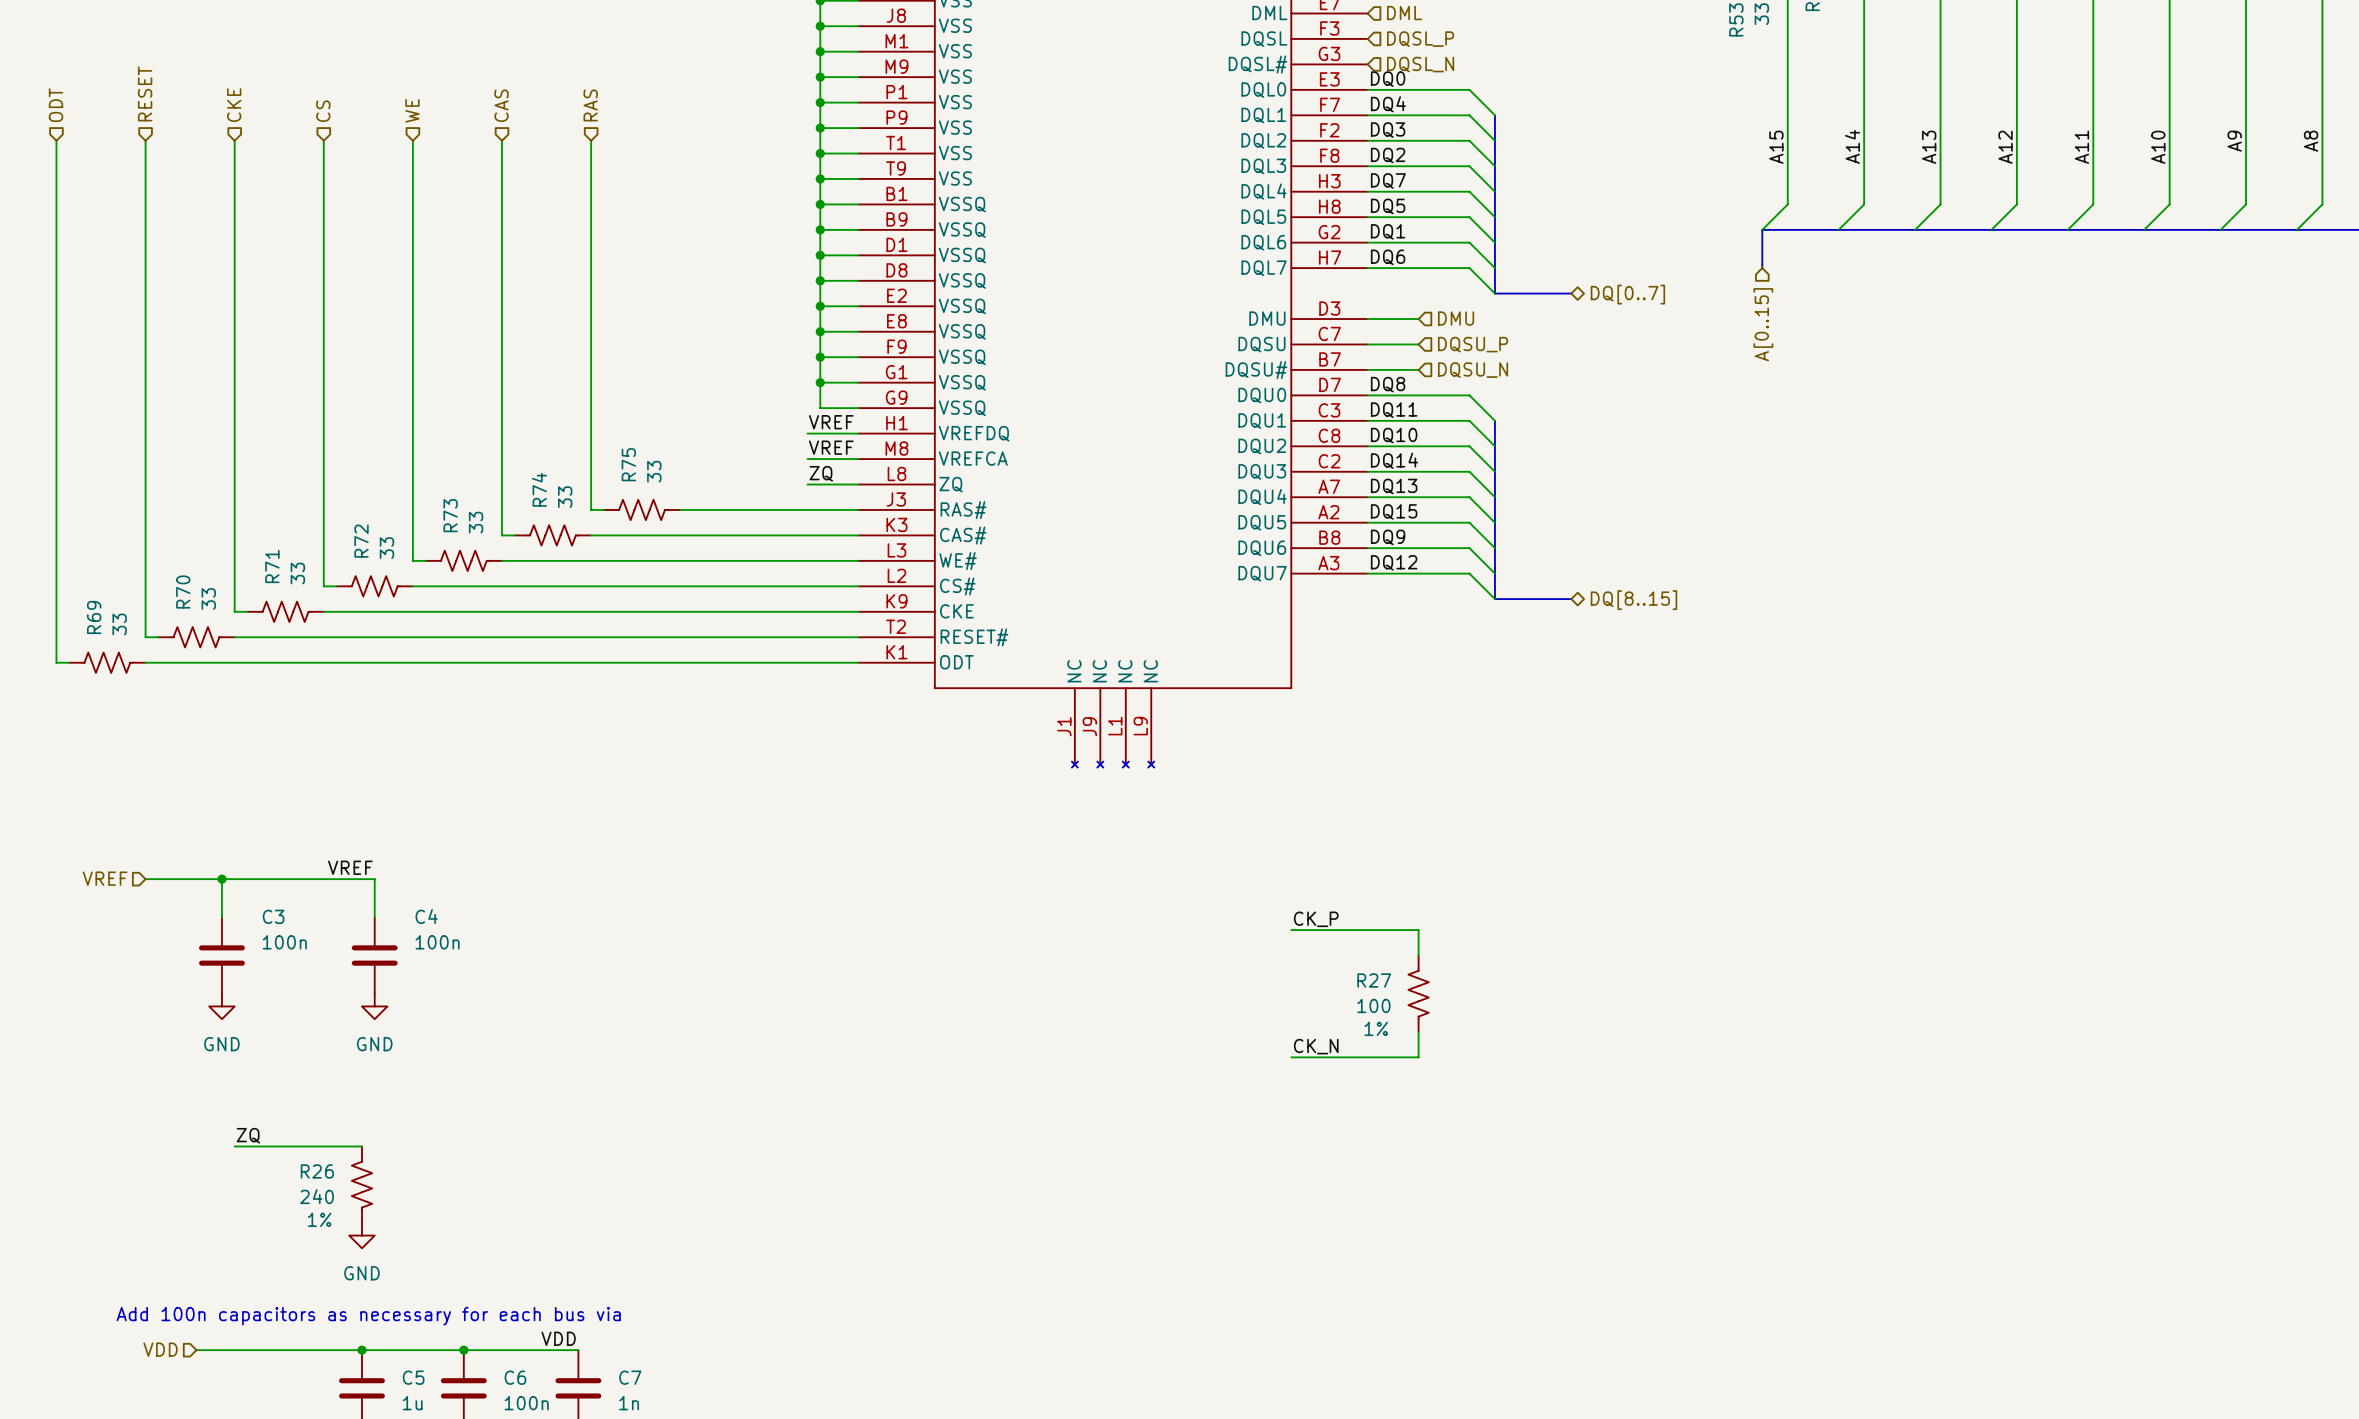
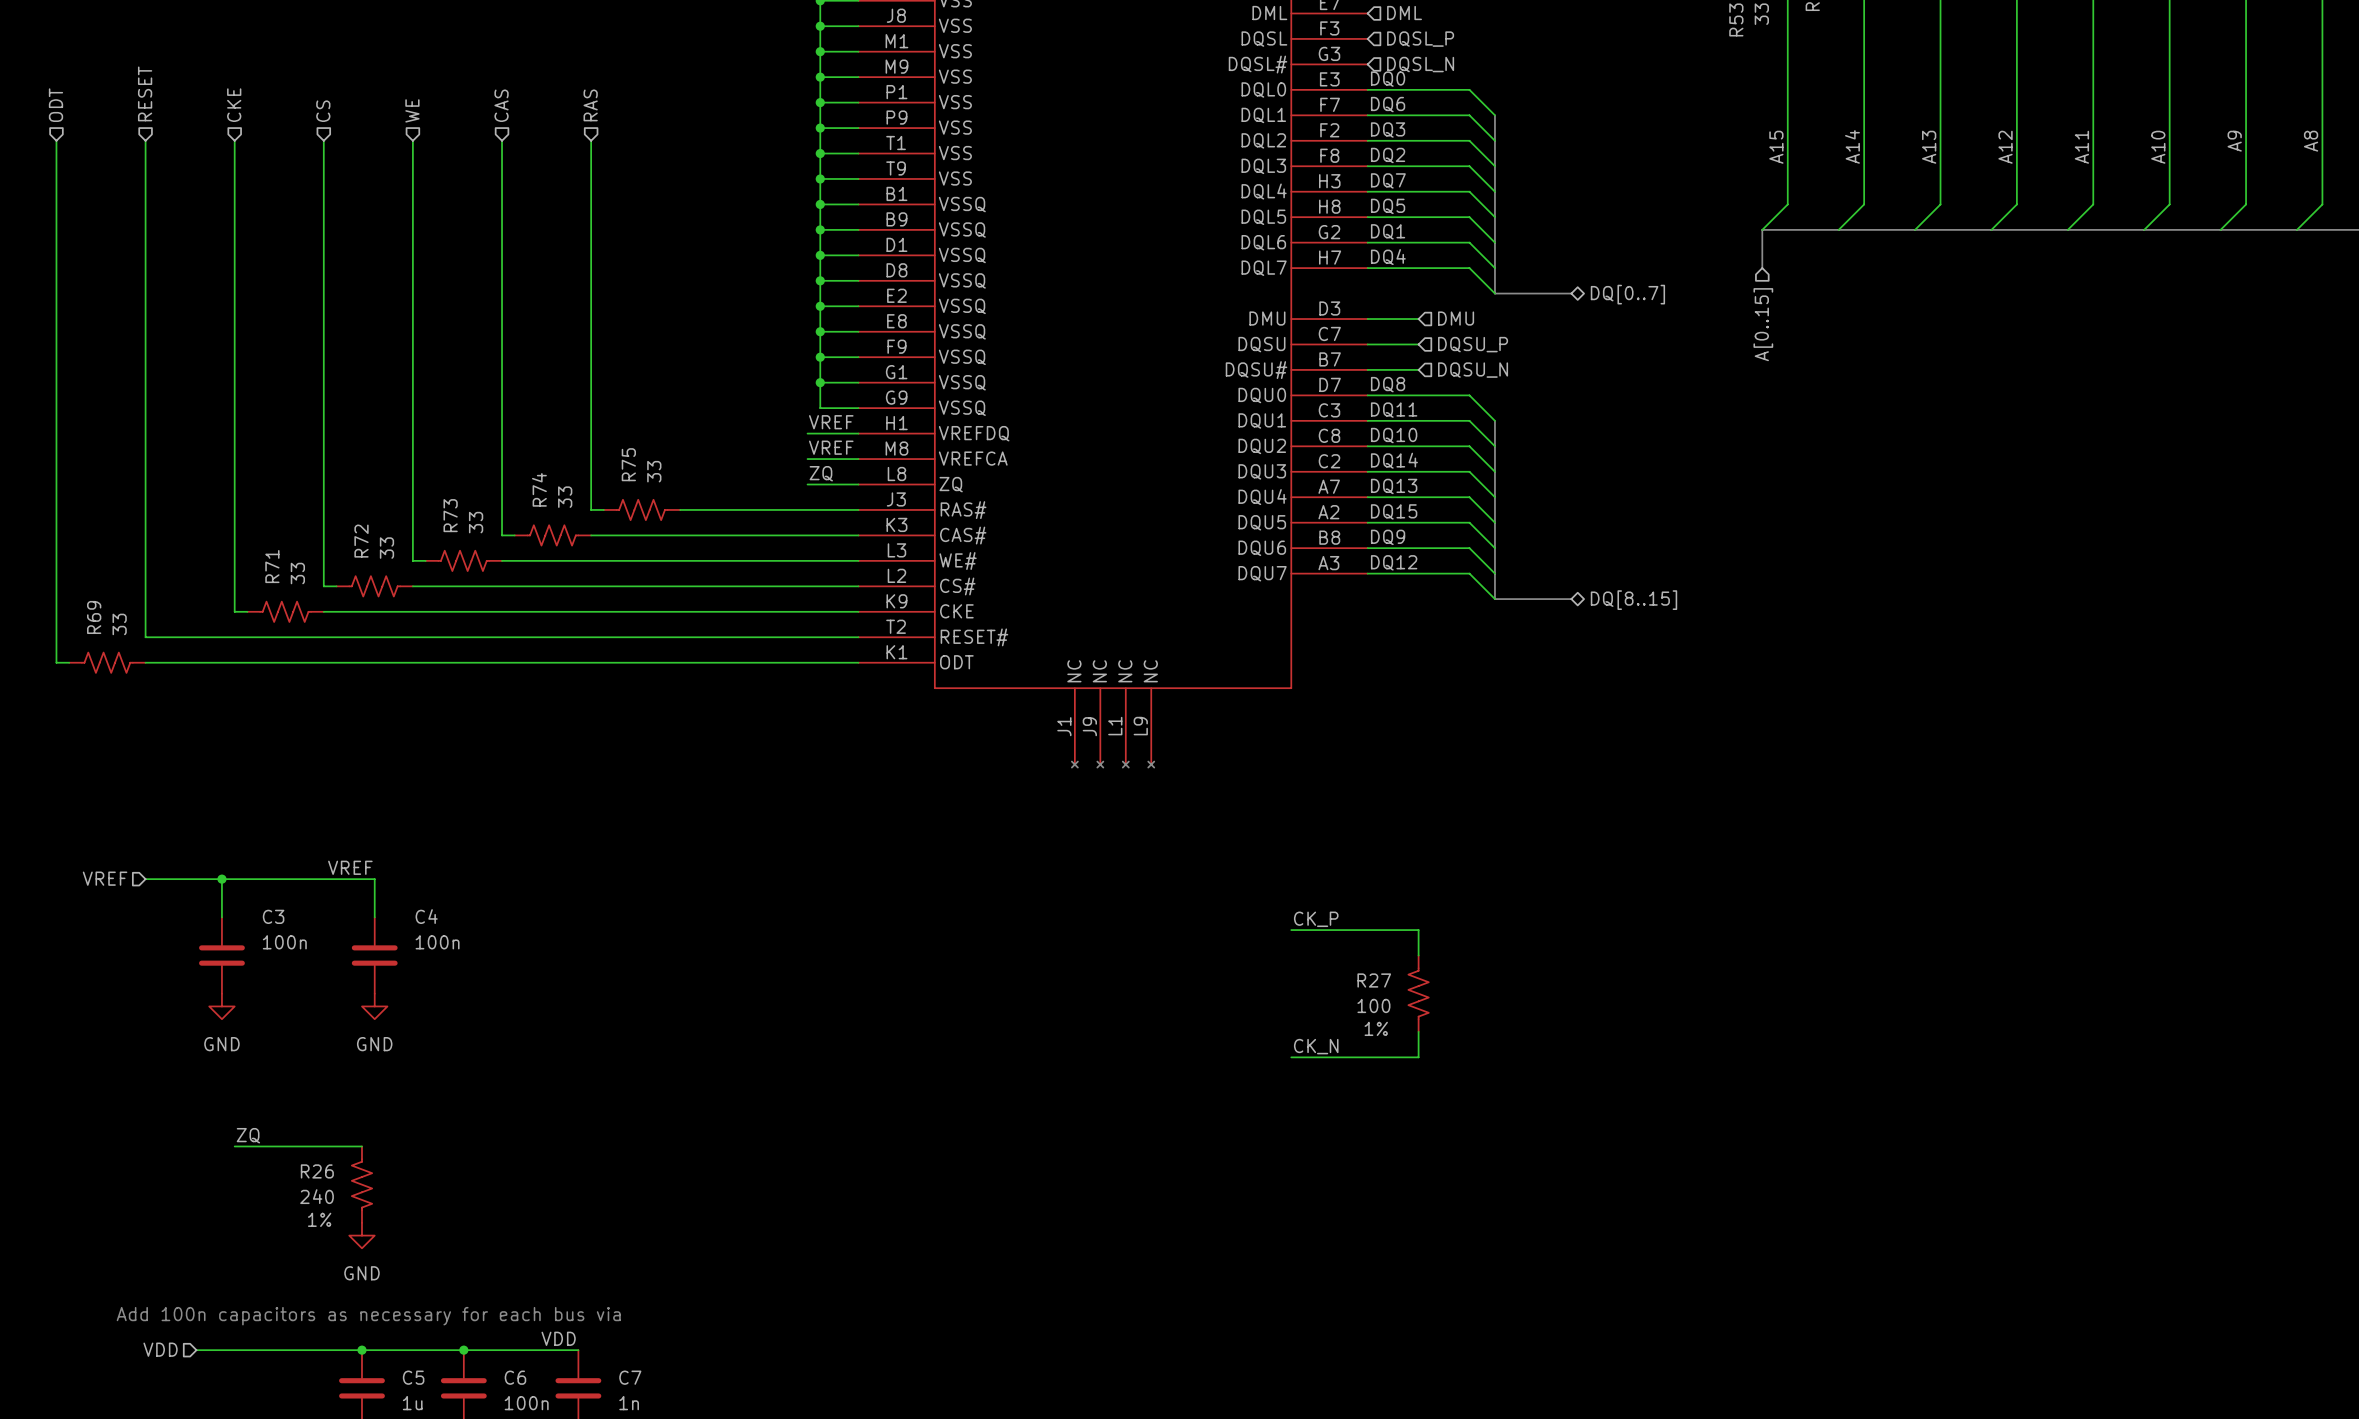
label: DQ4 (1388, 104) -> DQ6 (1388, 104)
label: DQ6 (1388, 257) -> DQ4 (1388, 257)
R70: 33 (196, 637) -> none

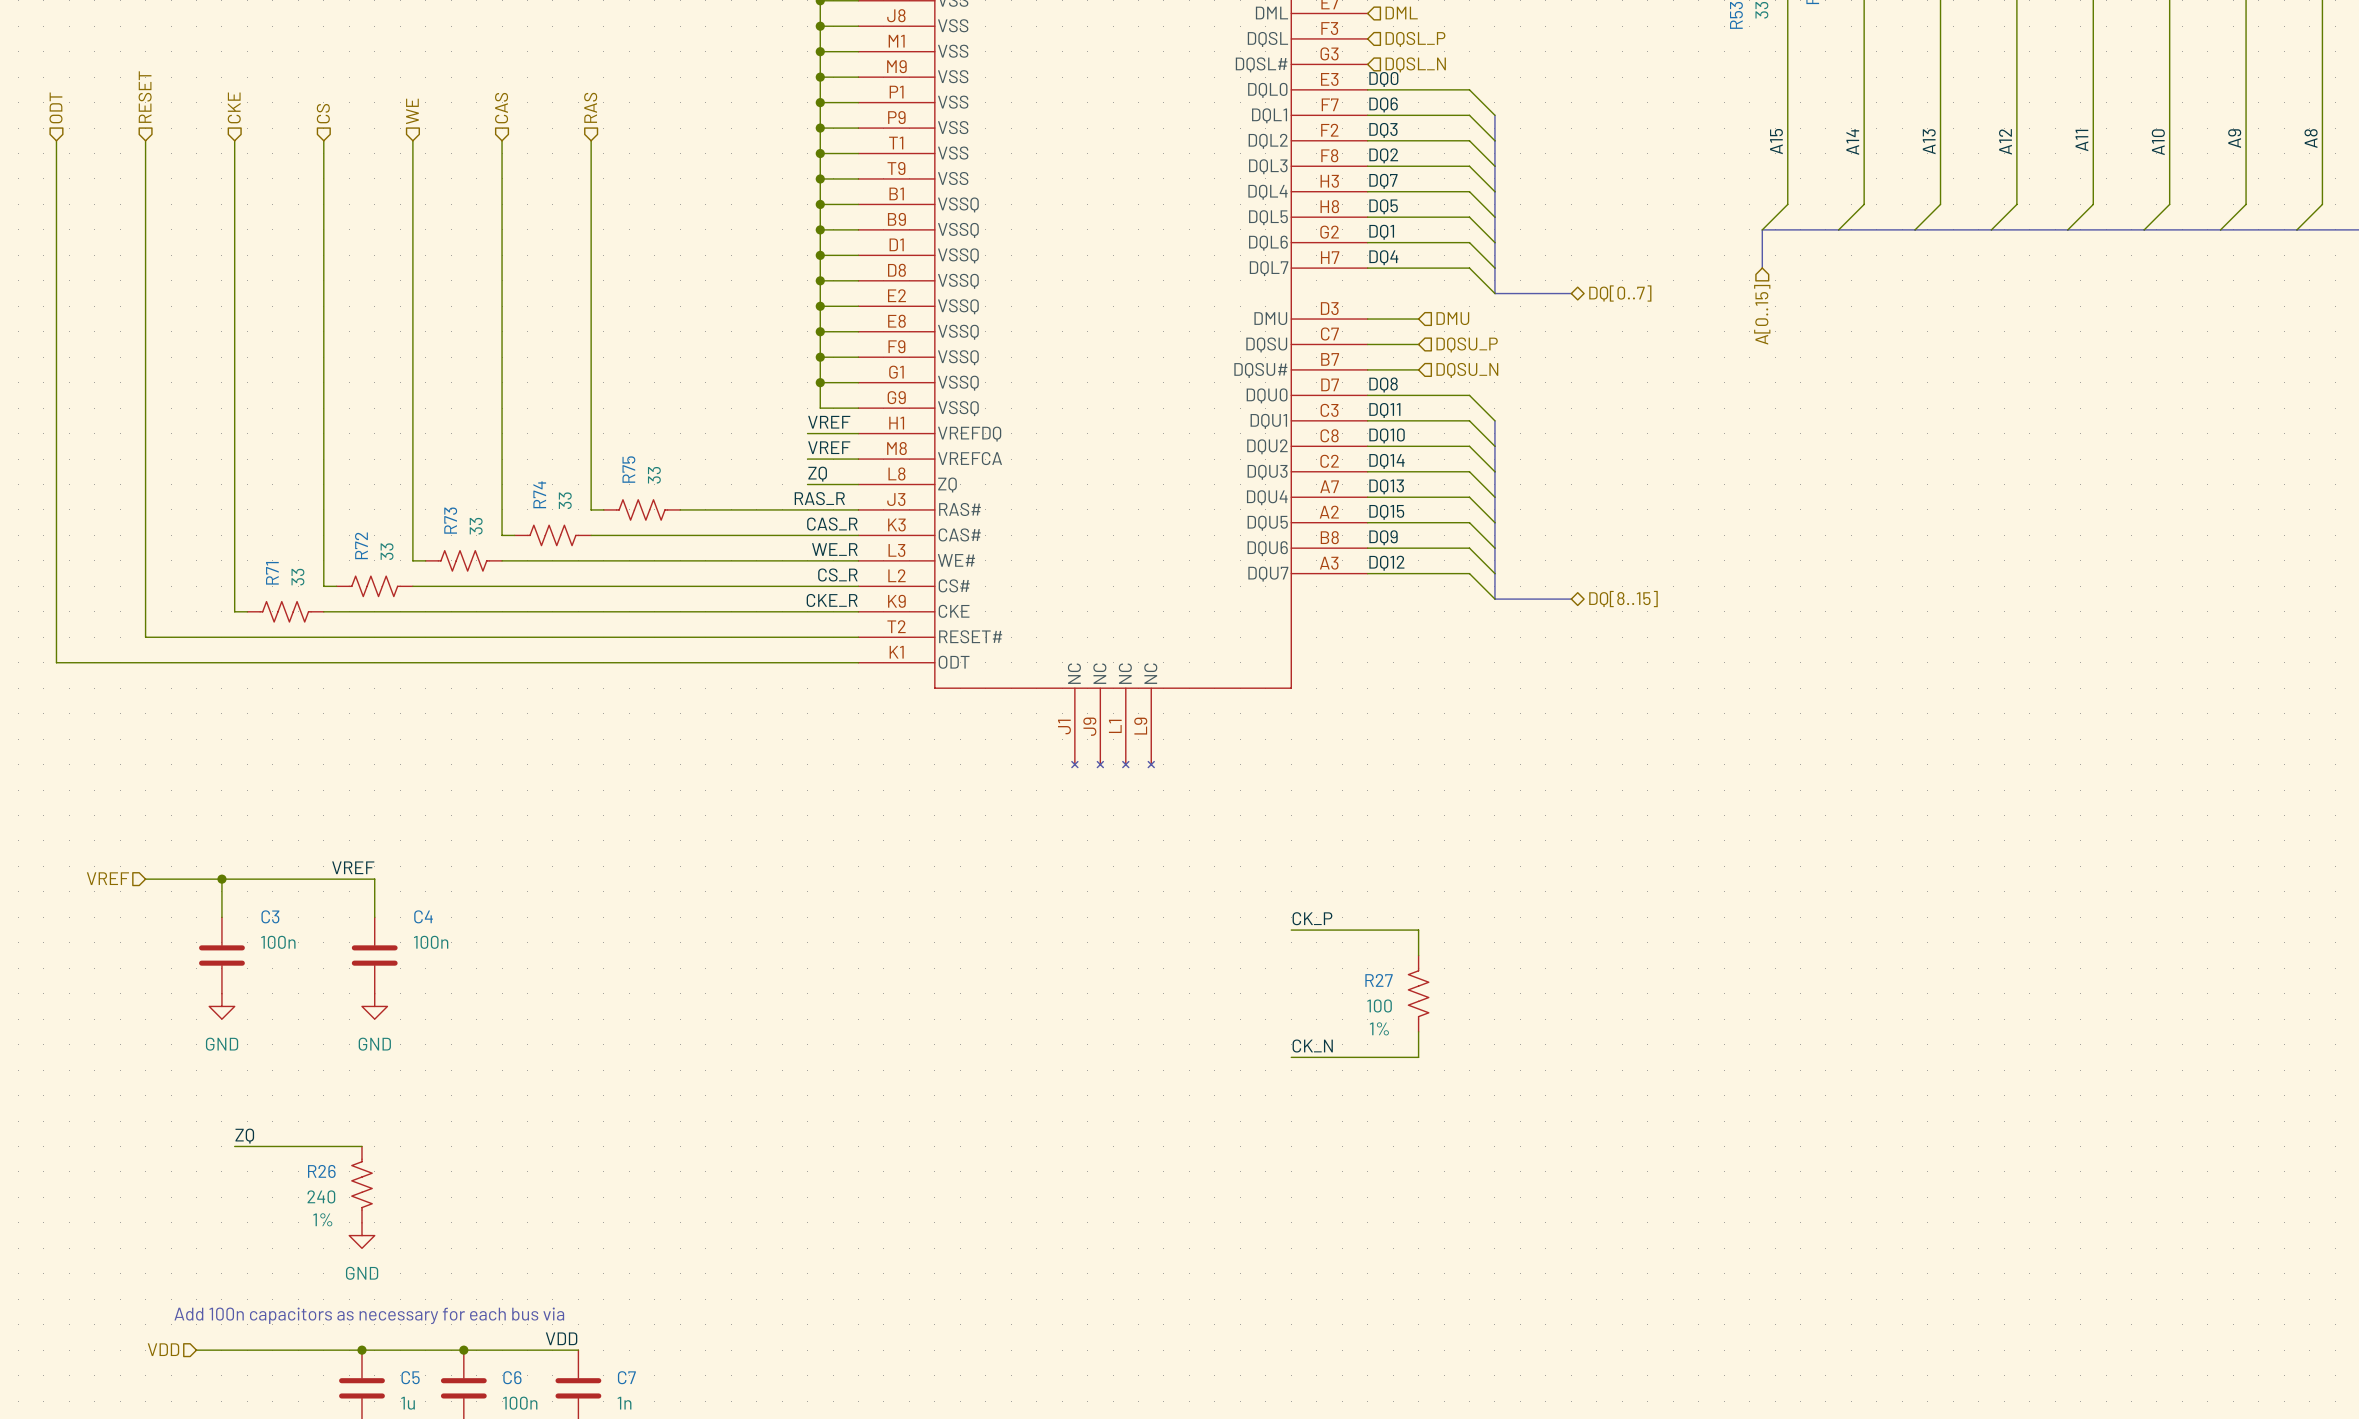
label: none -> RAS_R (819, 498)
label: none -> CAS_R (832, 524)
label: none -> WE_R (834, 549)
label: none -> CS_R (837, 574)
label: none -> CKE_R (832, 600)
R69: 33 (107, 662) -> none

